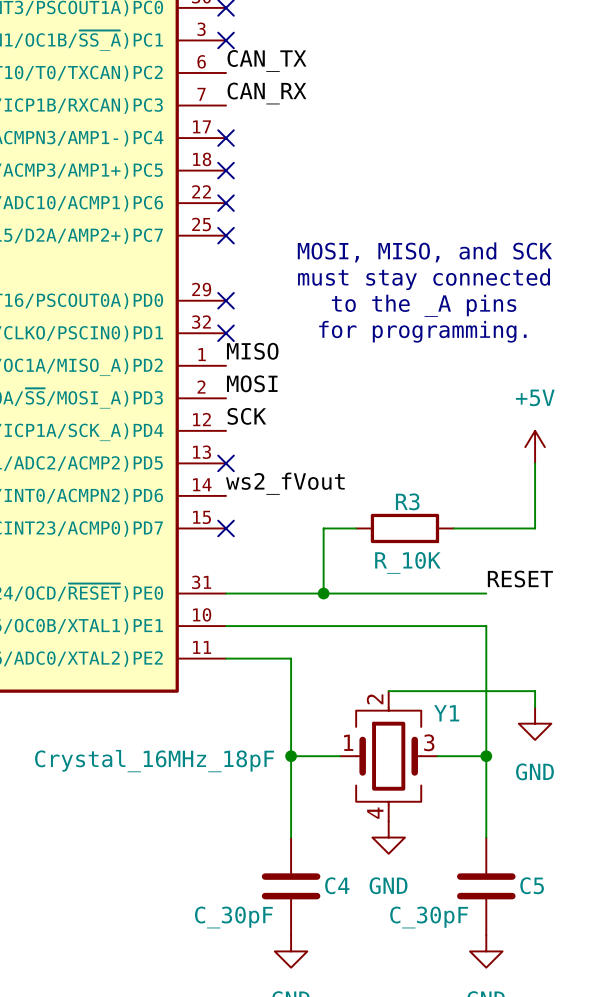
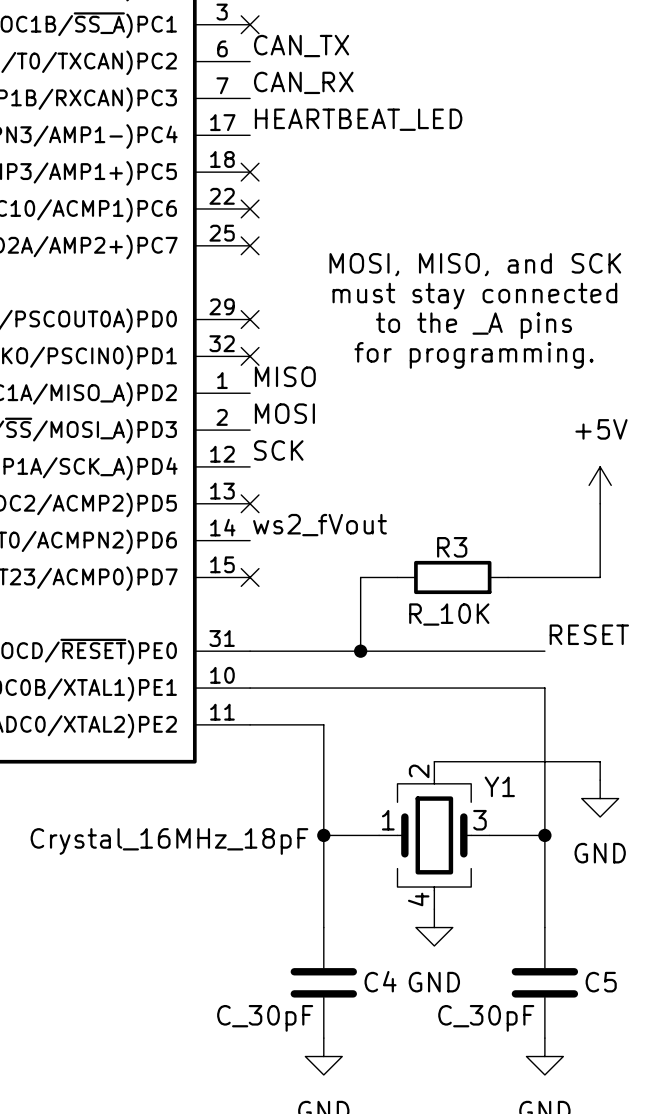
label: none -> HEARTBEAT_LED (358, 119)
no-connect mark: (226, 138) -> none

